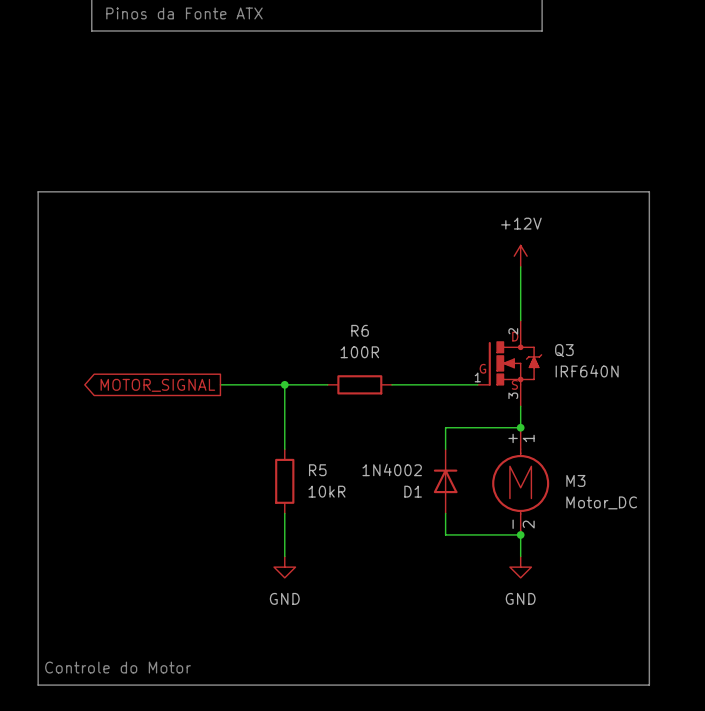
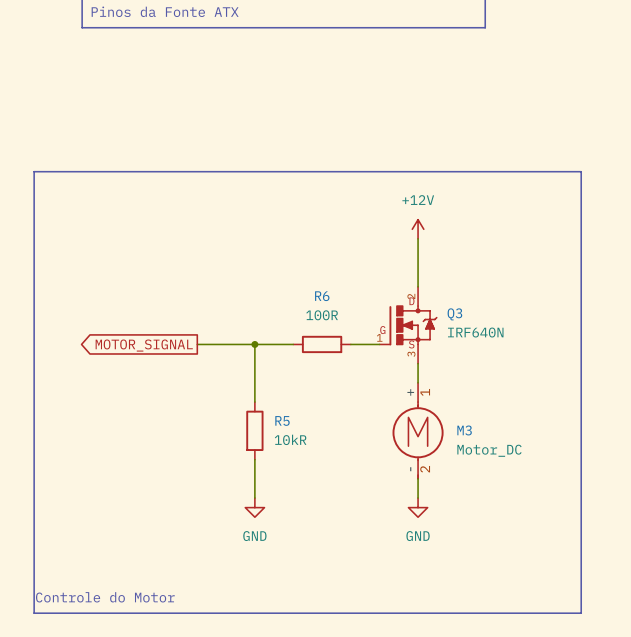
power symbol position: +12V (520, 256) -> +12V (418, 229)
wire: (520, 266) (520, 320) -> (418, 238) (418, 286)
Q3 position: (509, 363) -> (408, 325)
wire: (424, 384) (477, 384) -> none
wire: none -> (418, 363) (418, 382)
wire: (520, 406) (520, 427) (445, 427) (445, 449) -> none
junction: (520, 427) -> none
D1: 1N4002 (445, 481) -> none
M3 position: (520, 481) -> (418, 430)
wire: (445, 513) (445, 534) (520, 534) (520, 556) -> none
wire: none -> (418, 478) (418, 498)
junction: (520, 534) -> none
power symbol position: GND (520, 567) -> GND (418, 507)

